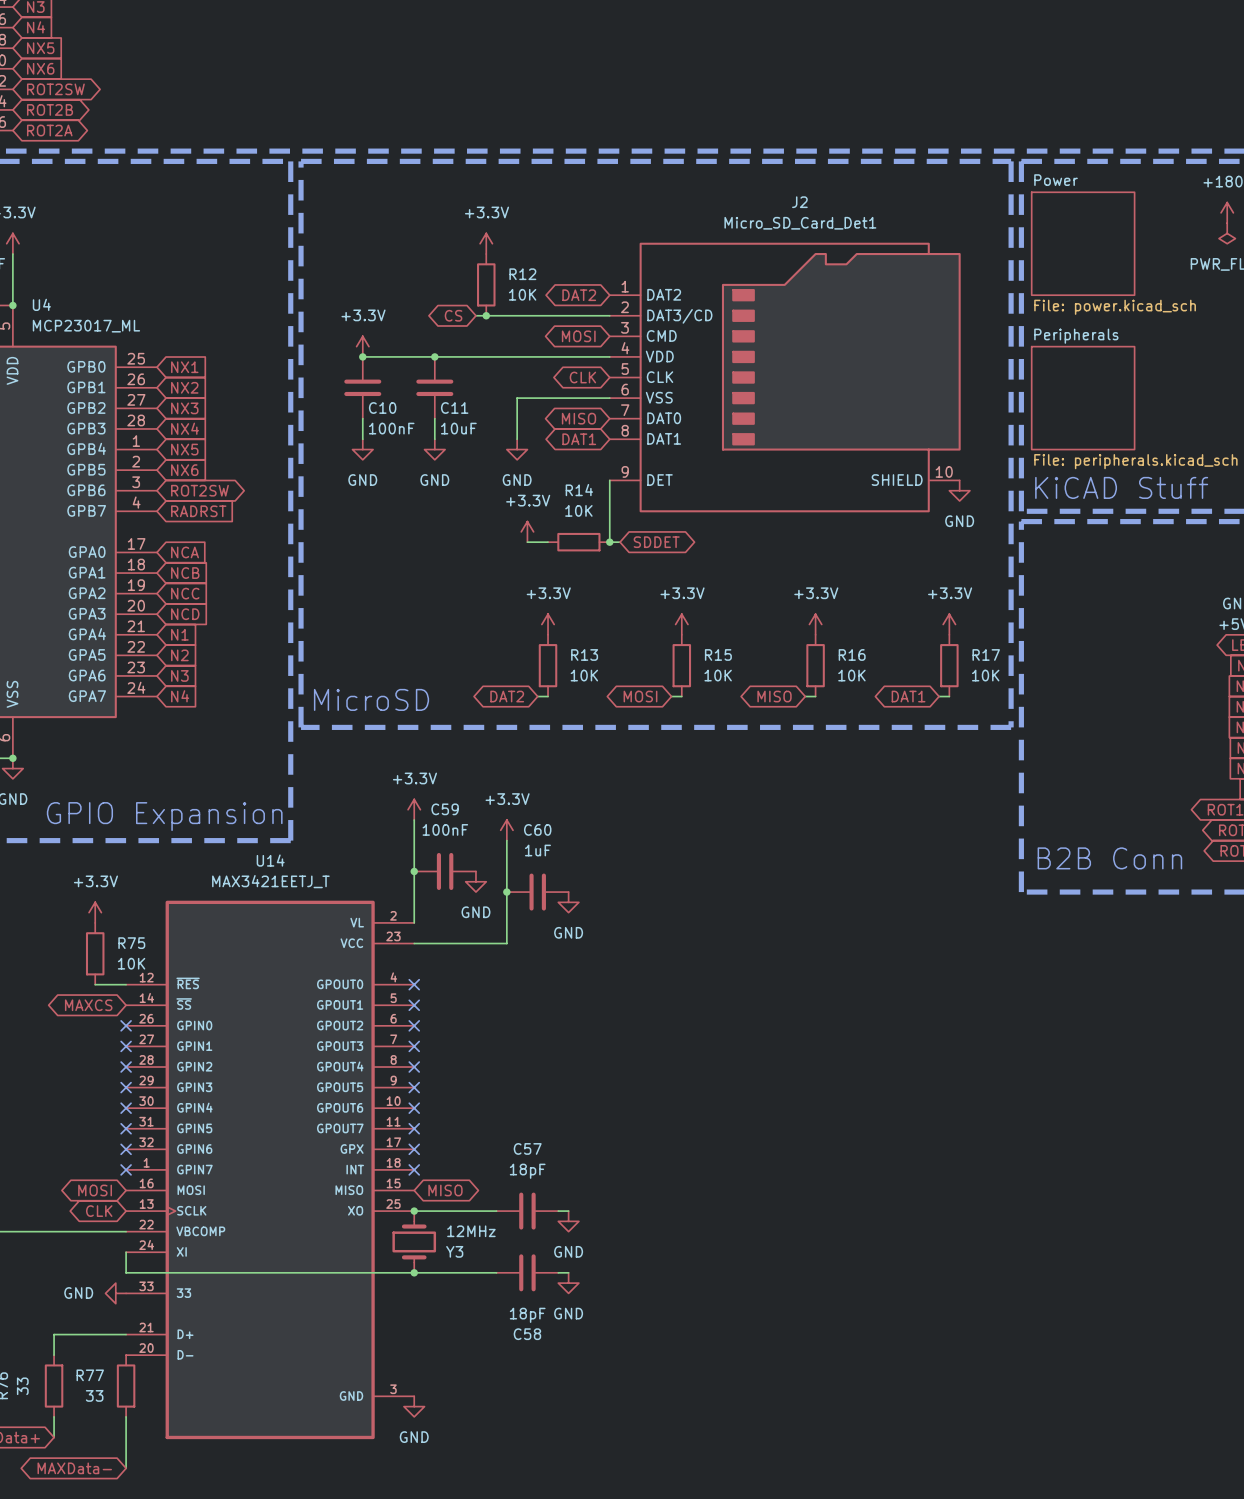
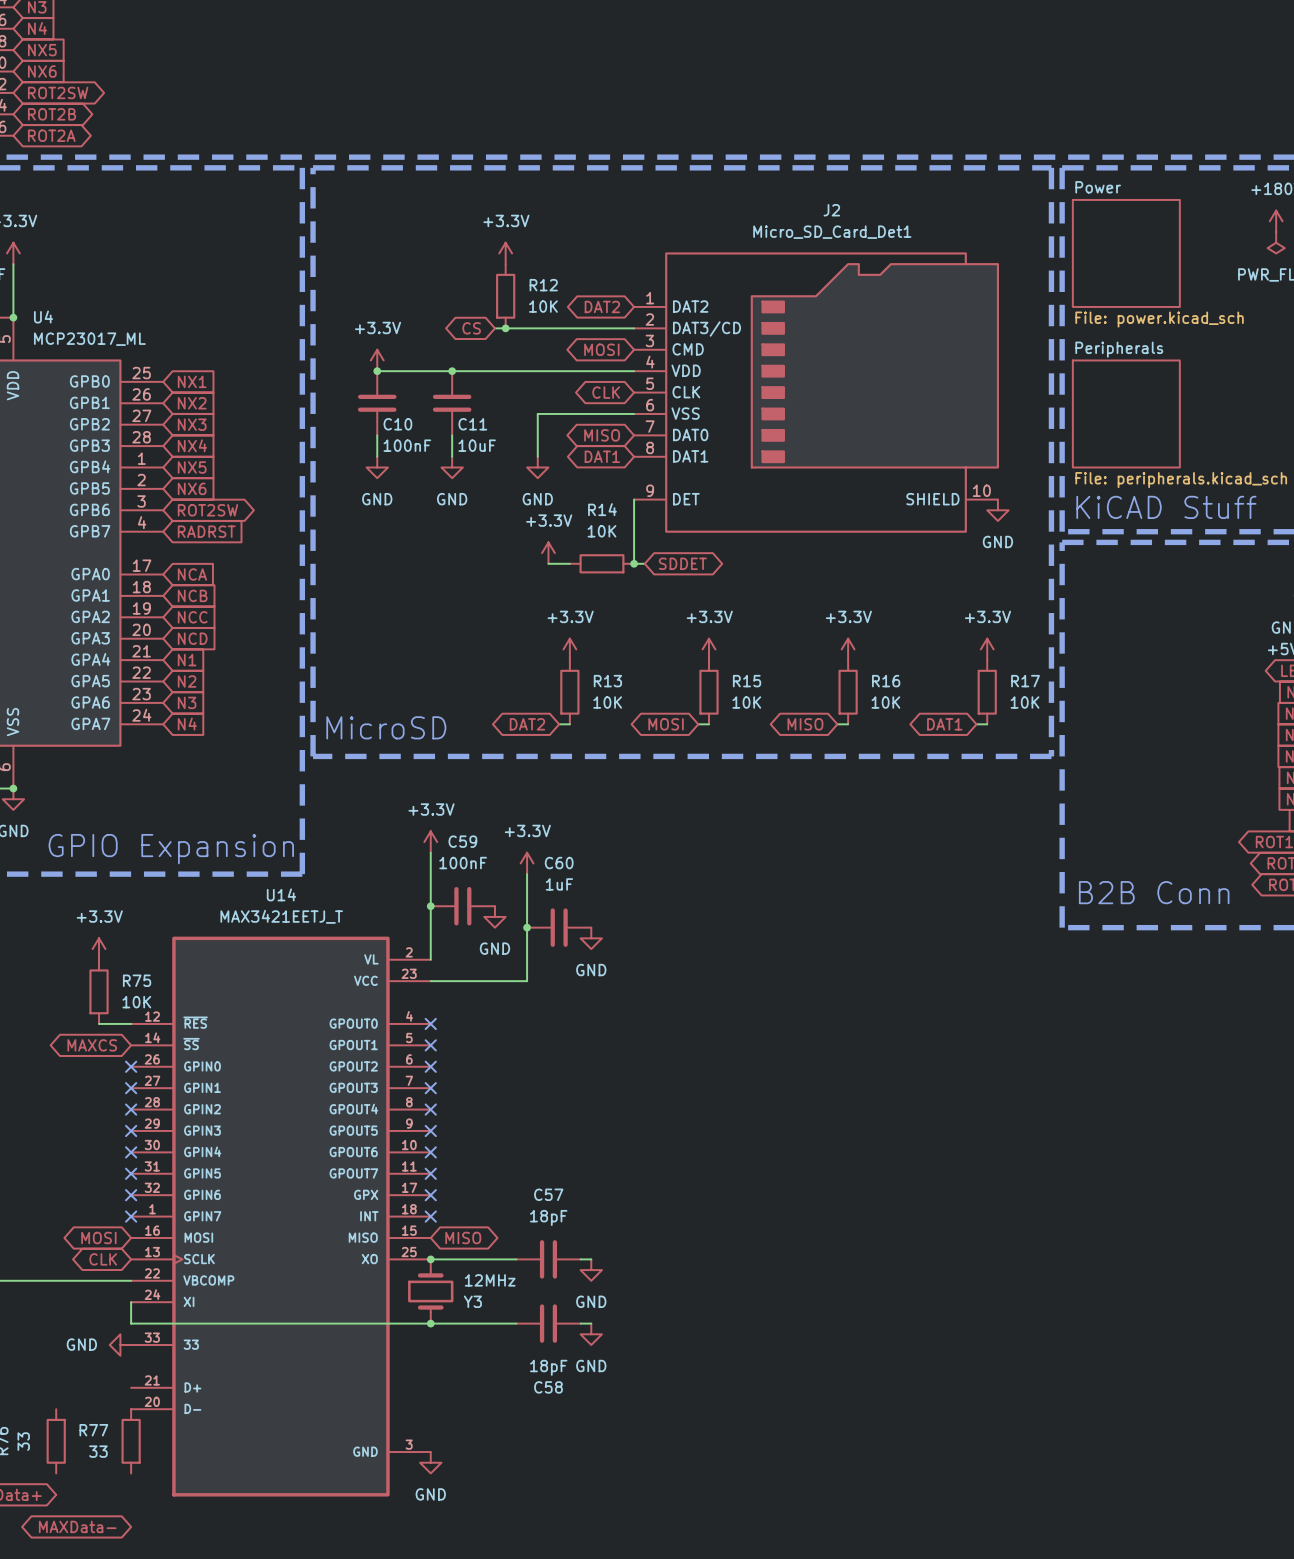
wire: (126, 1334) (54, 1334) (54, 1355) -> none
wire: (54, 1416) (54, 1437) -> none
wire: (126, 1416) (126, 1468) -> none

